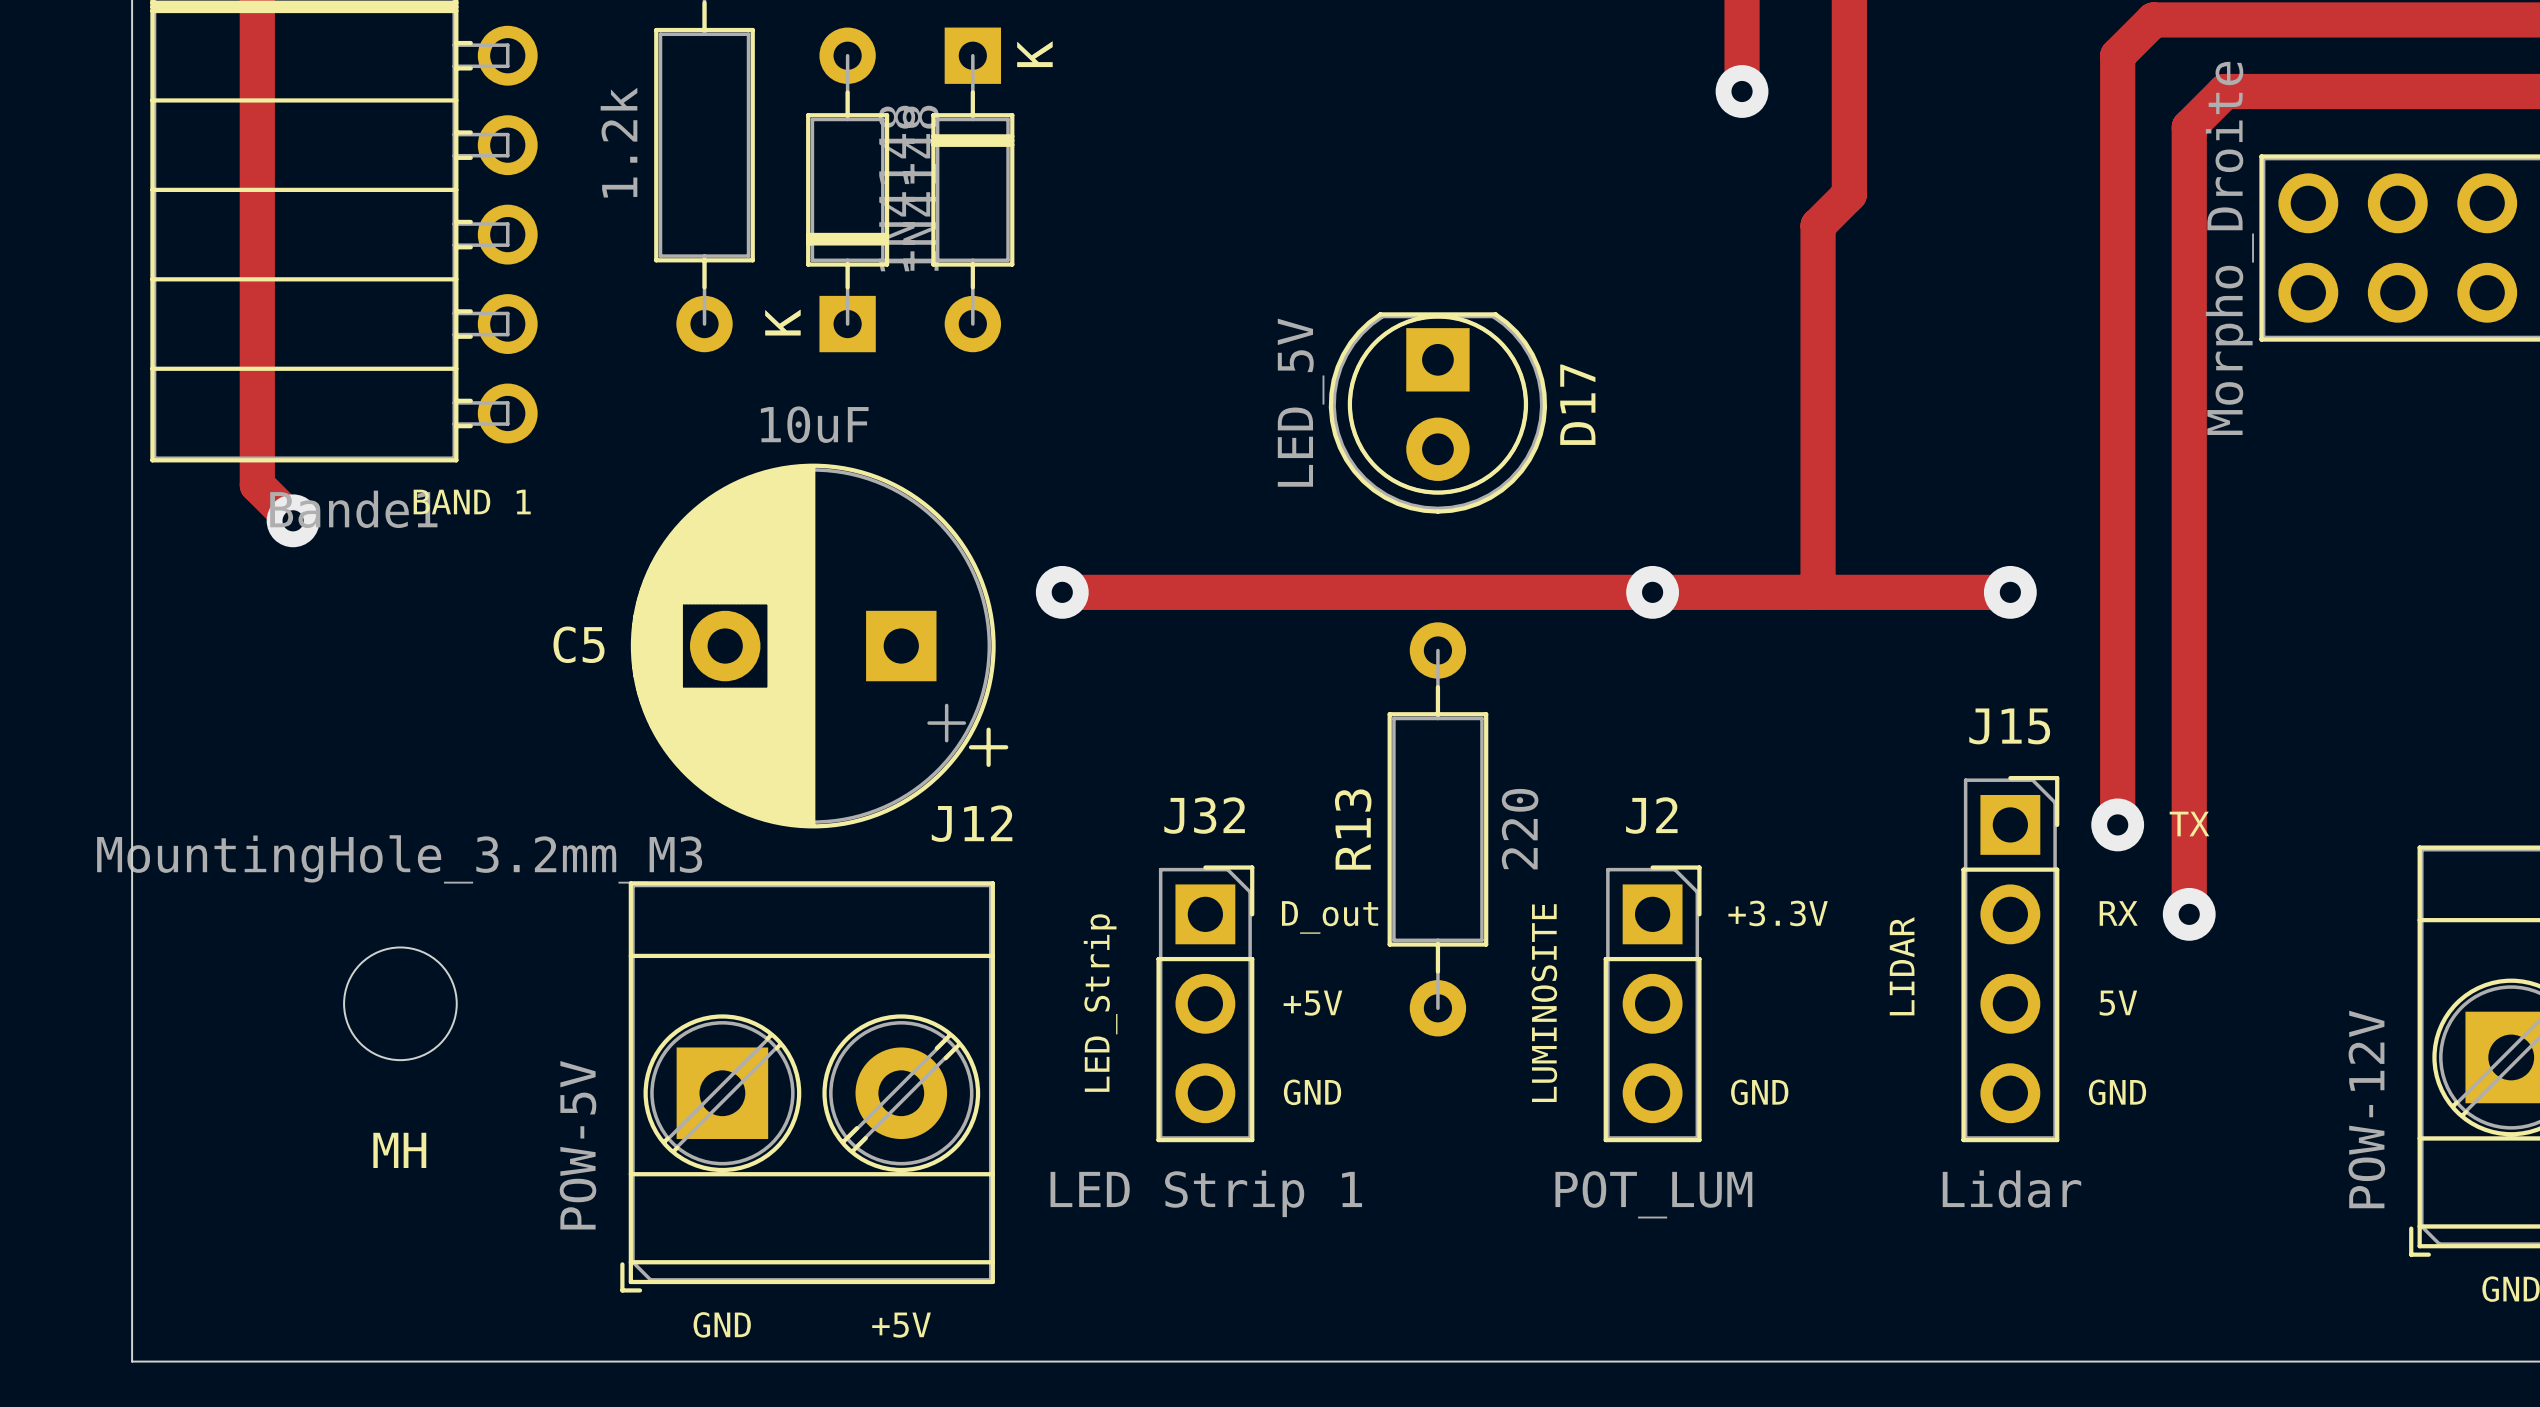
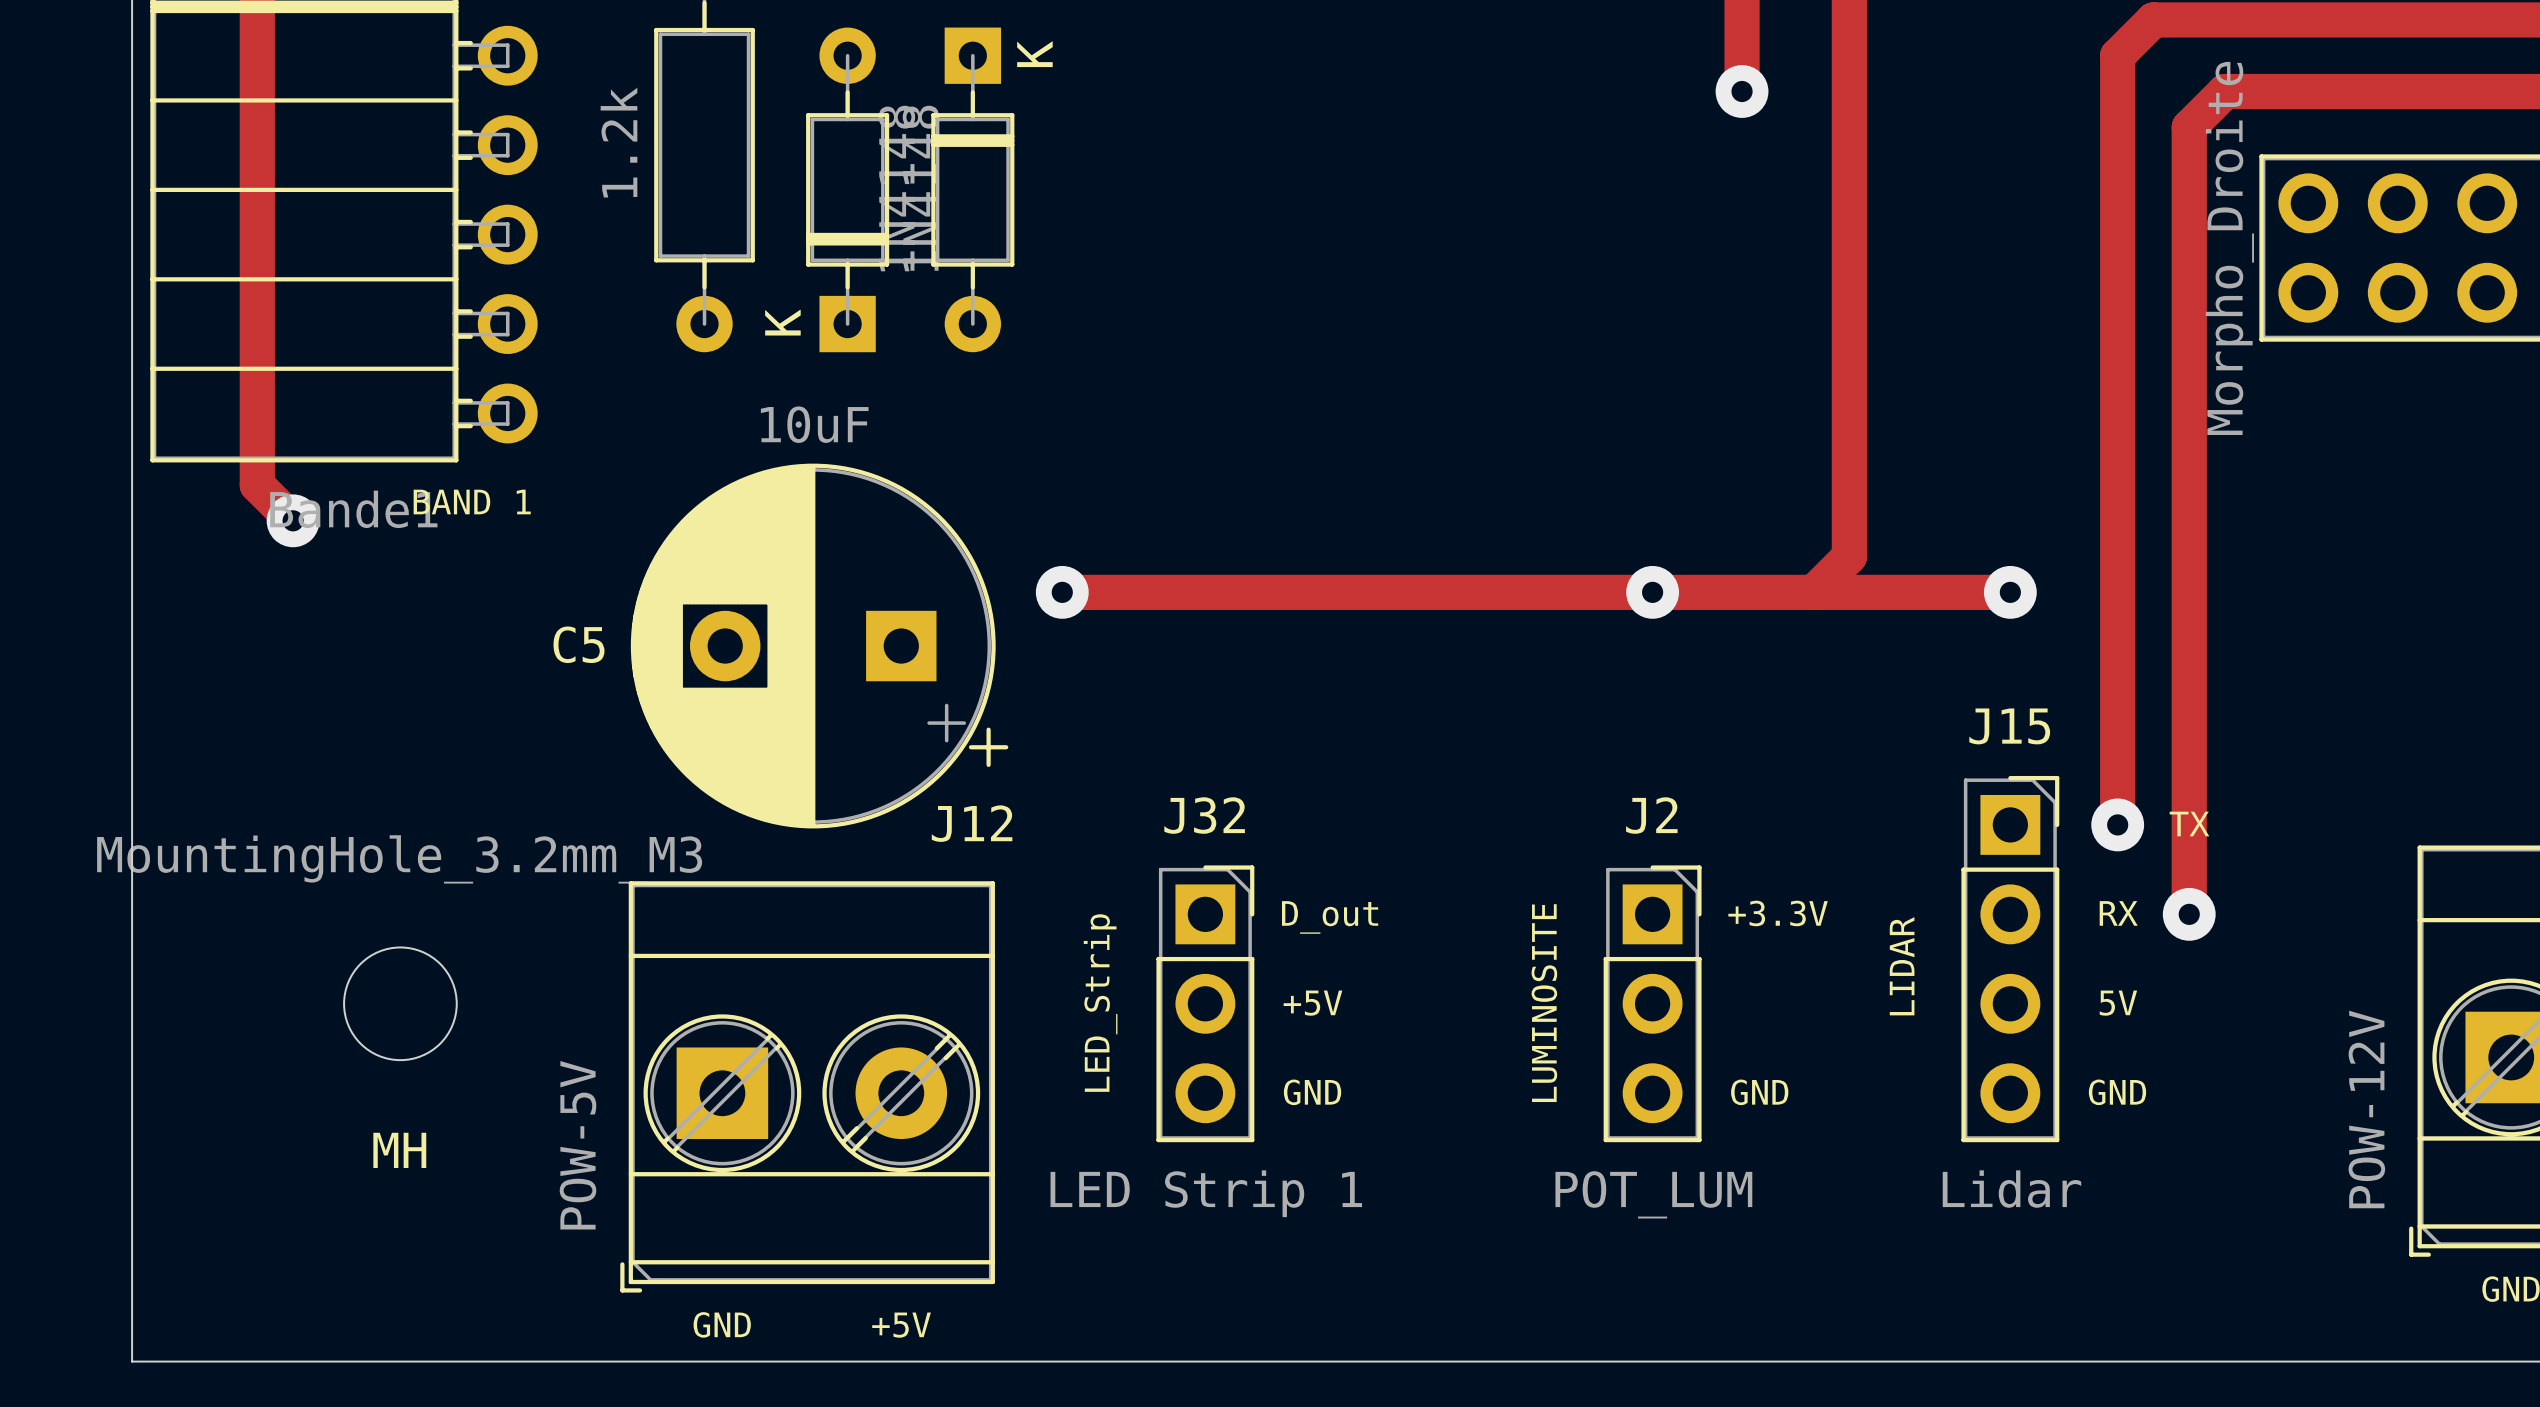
track: (1849, 194) (1818, 225) (1818, 587) -> (1849, 194) (1849, 556) (1818, 587)
D17: LED_5V (1437, 413) -> none
R13: 220 (1437, 829) -> none

